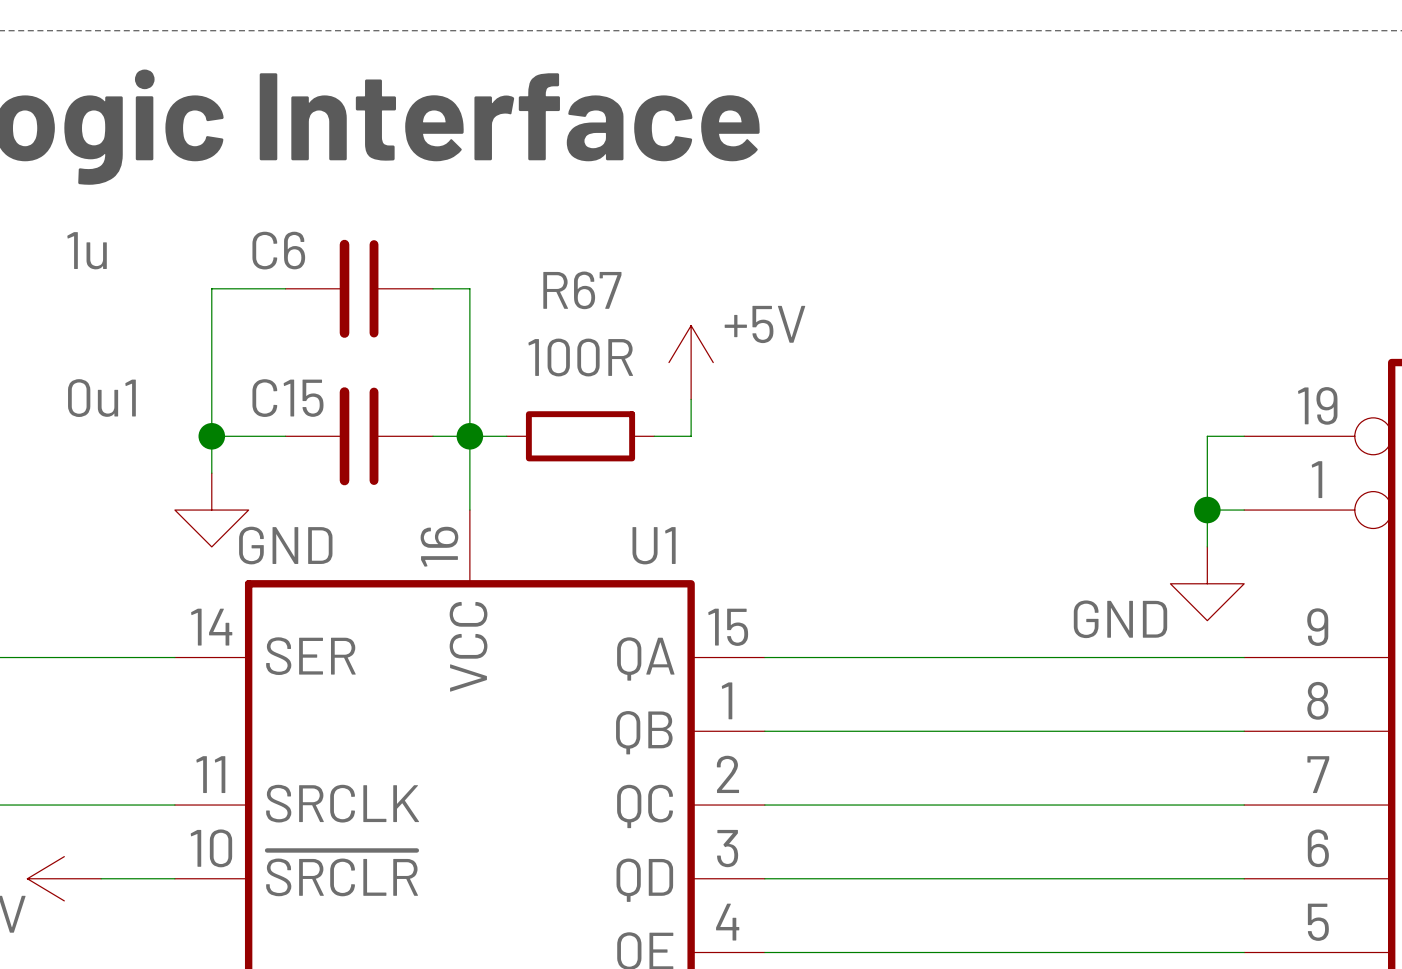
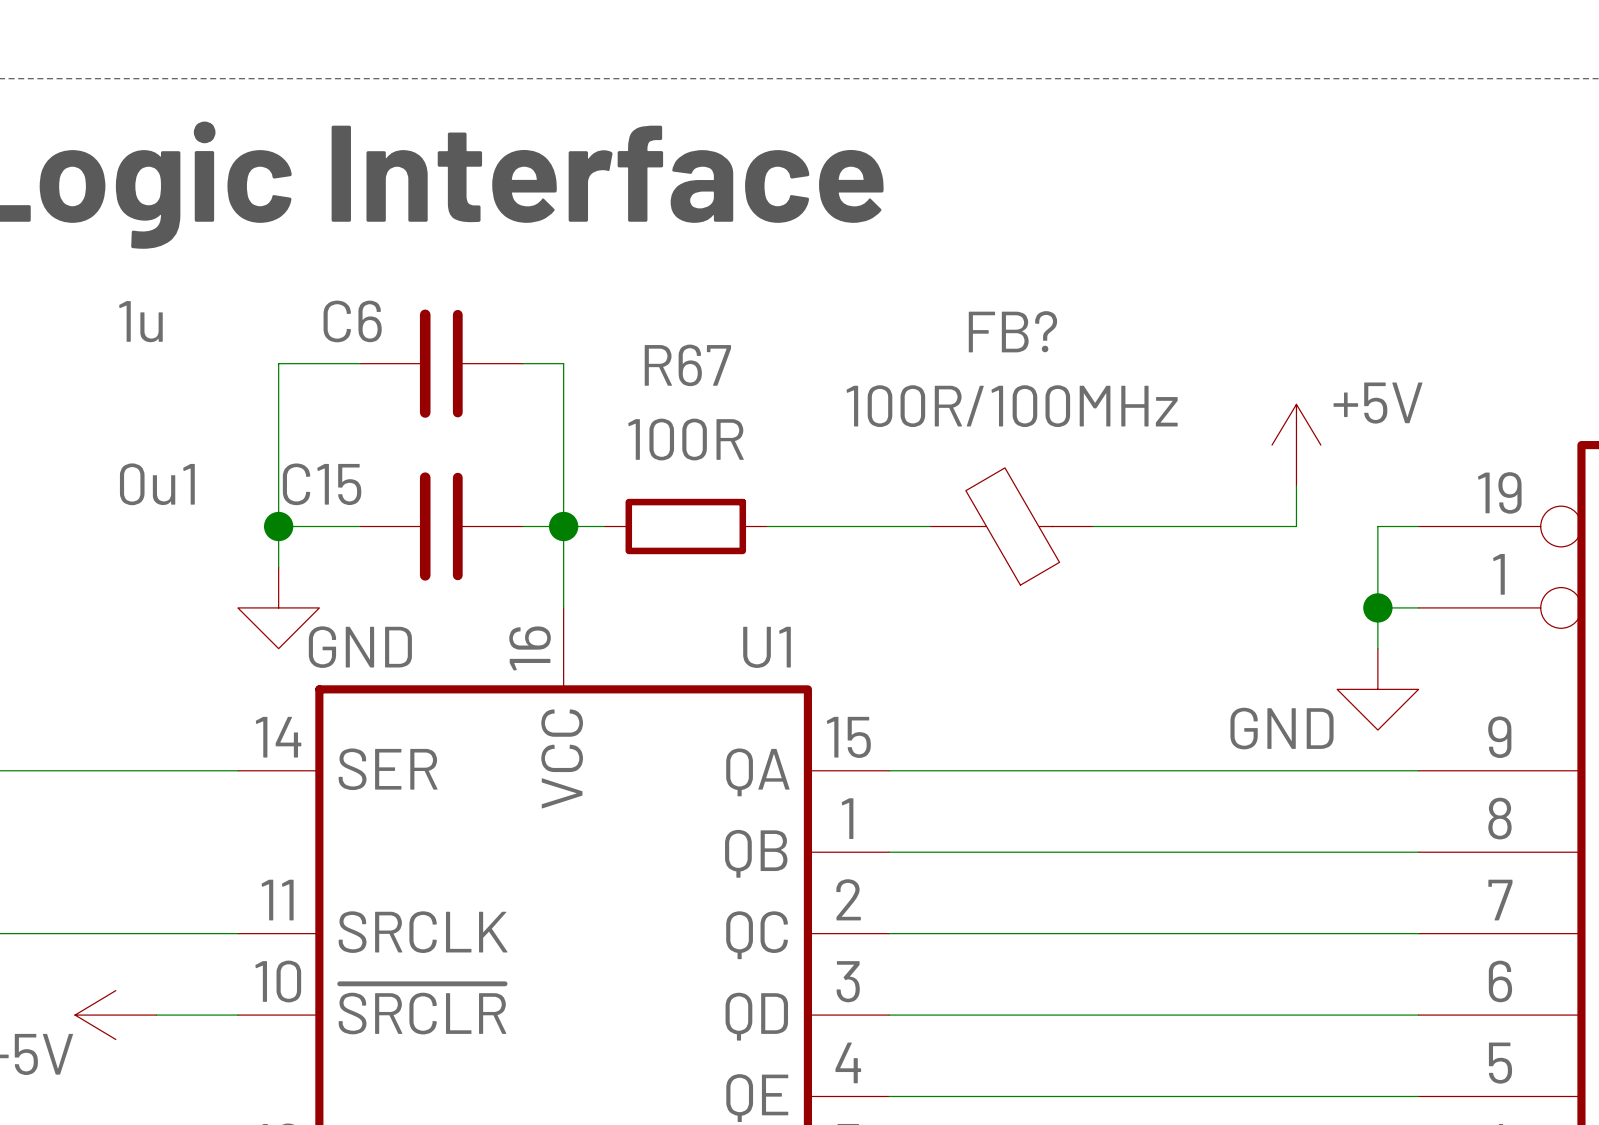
power symbol position: +5V (691, 362) -> +5V (1296, 445)
C15 name position: C15 (287, 398) -> C15 (322, 484)
wire: (691, 399) (691, 436) -> (930, 526) (807, 526)
wire: none -> (1296, 485) (1296, 526) (1092, 526)
FB?: none -> 100R/100MHz (1011, 526)

